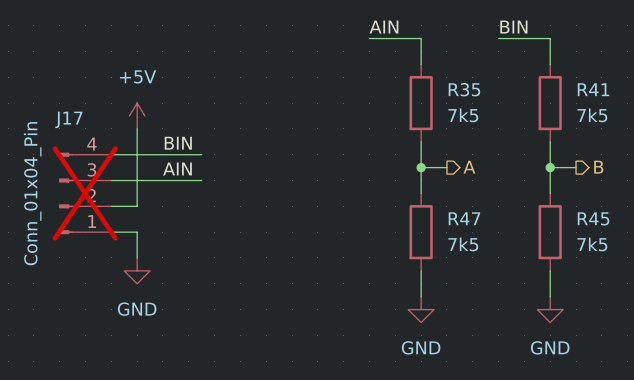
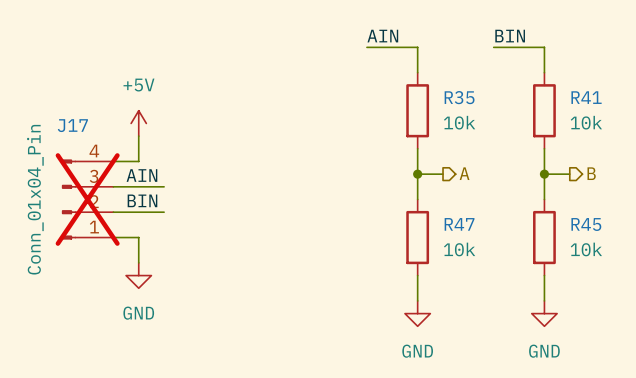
R35 value: 7k5 (463, 115) -> 10k (459, 122)
R41 value: 7k5 (592, 115) -> 10k (586, 122)
label position: BIN (178, 143) -> BIN (142, 200)
wire: (201, 154) (137, 154) (137, 206) -> (164, 212) (138, 212)
label position: AIN (177, 169) -> AIN (141, 175)
wire: (162, 180) (201, 180) -> none
R47 value: 7k5 (463, 244) -> 10k (459, 249)
R45 value: 7k5 (592, 244) -> 10k (586, 249)

